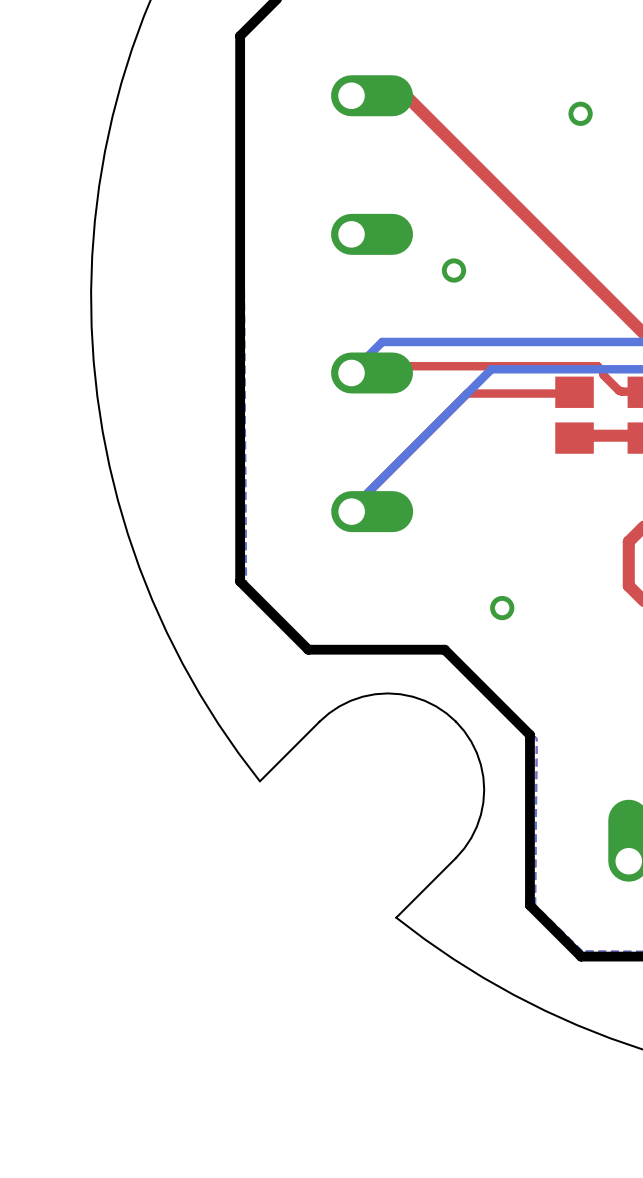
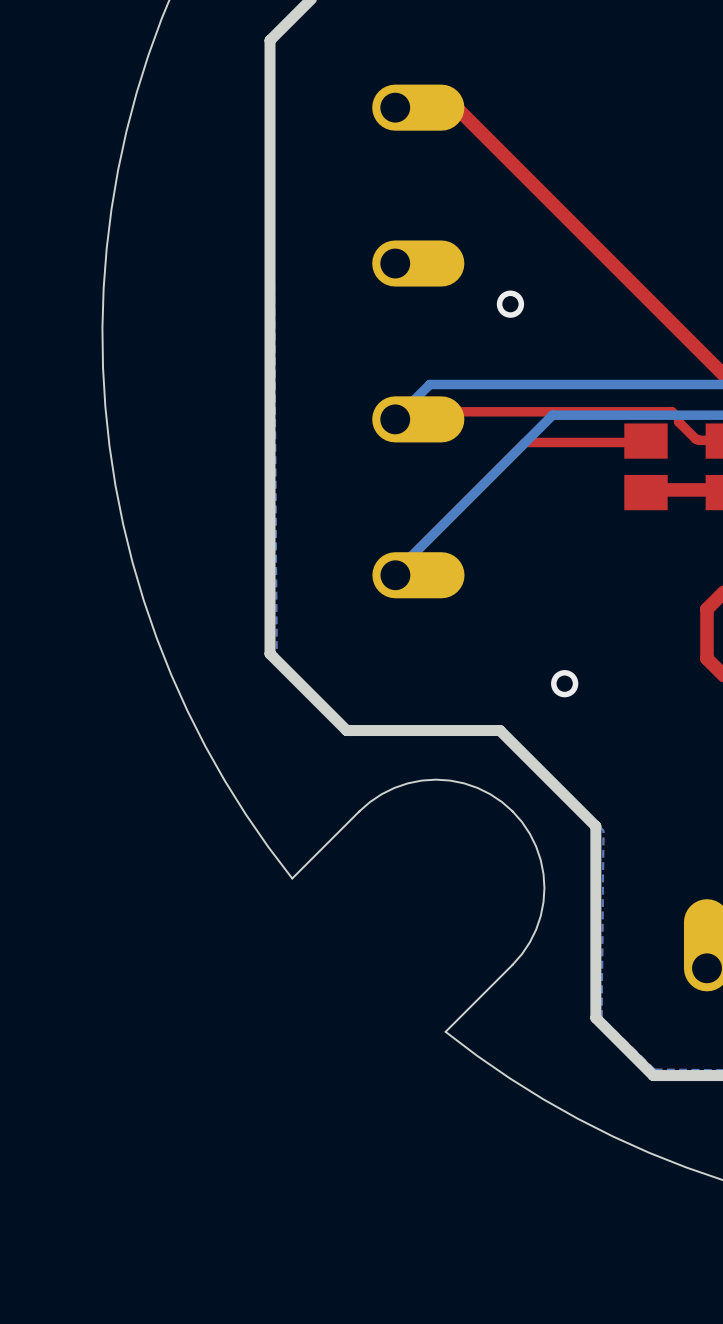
via: (580, 113) -> none

